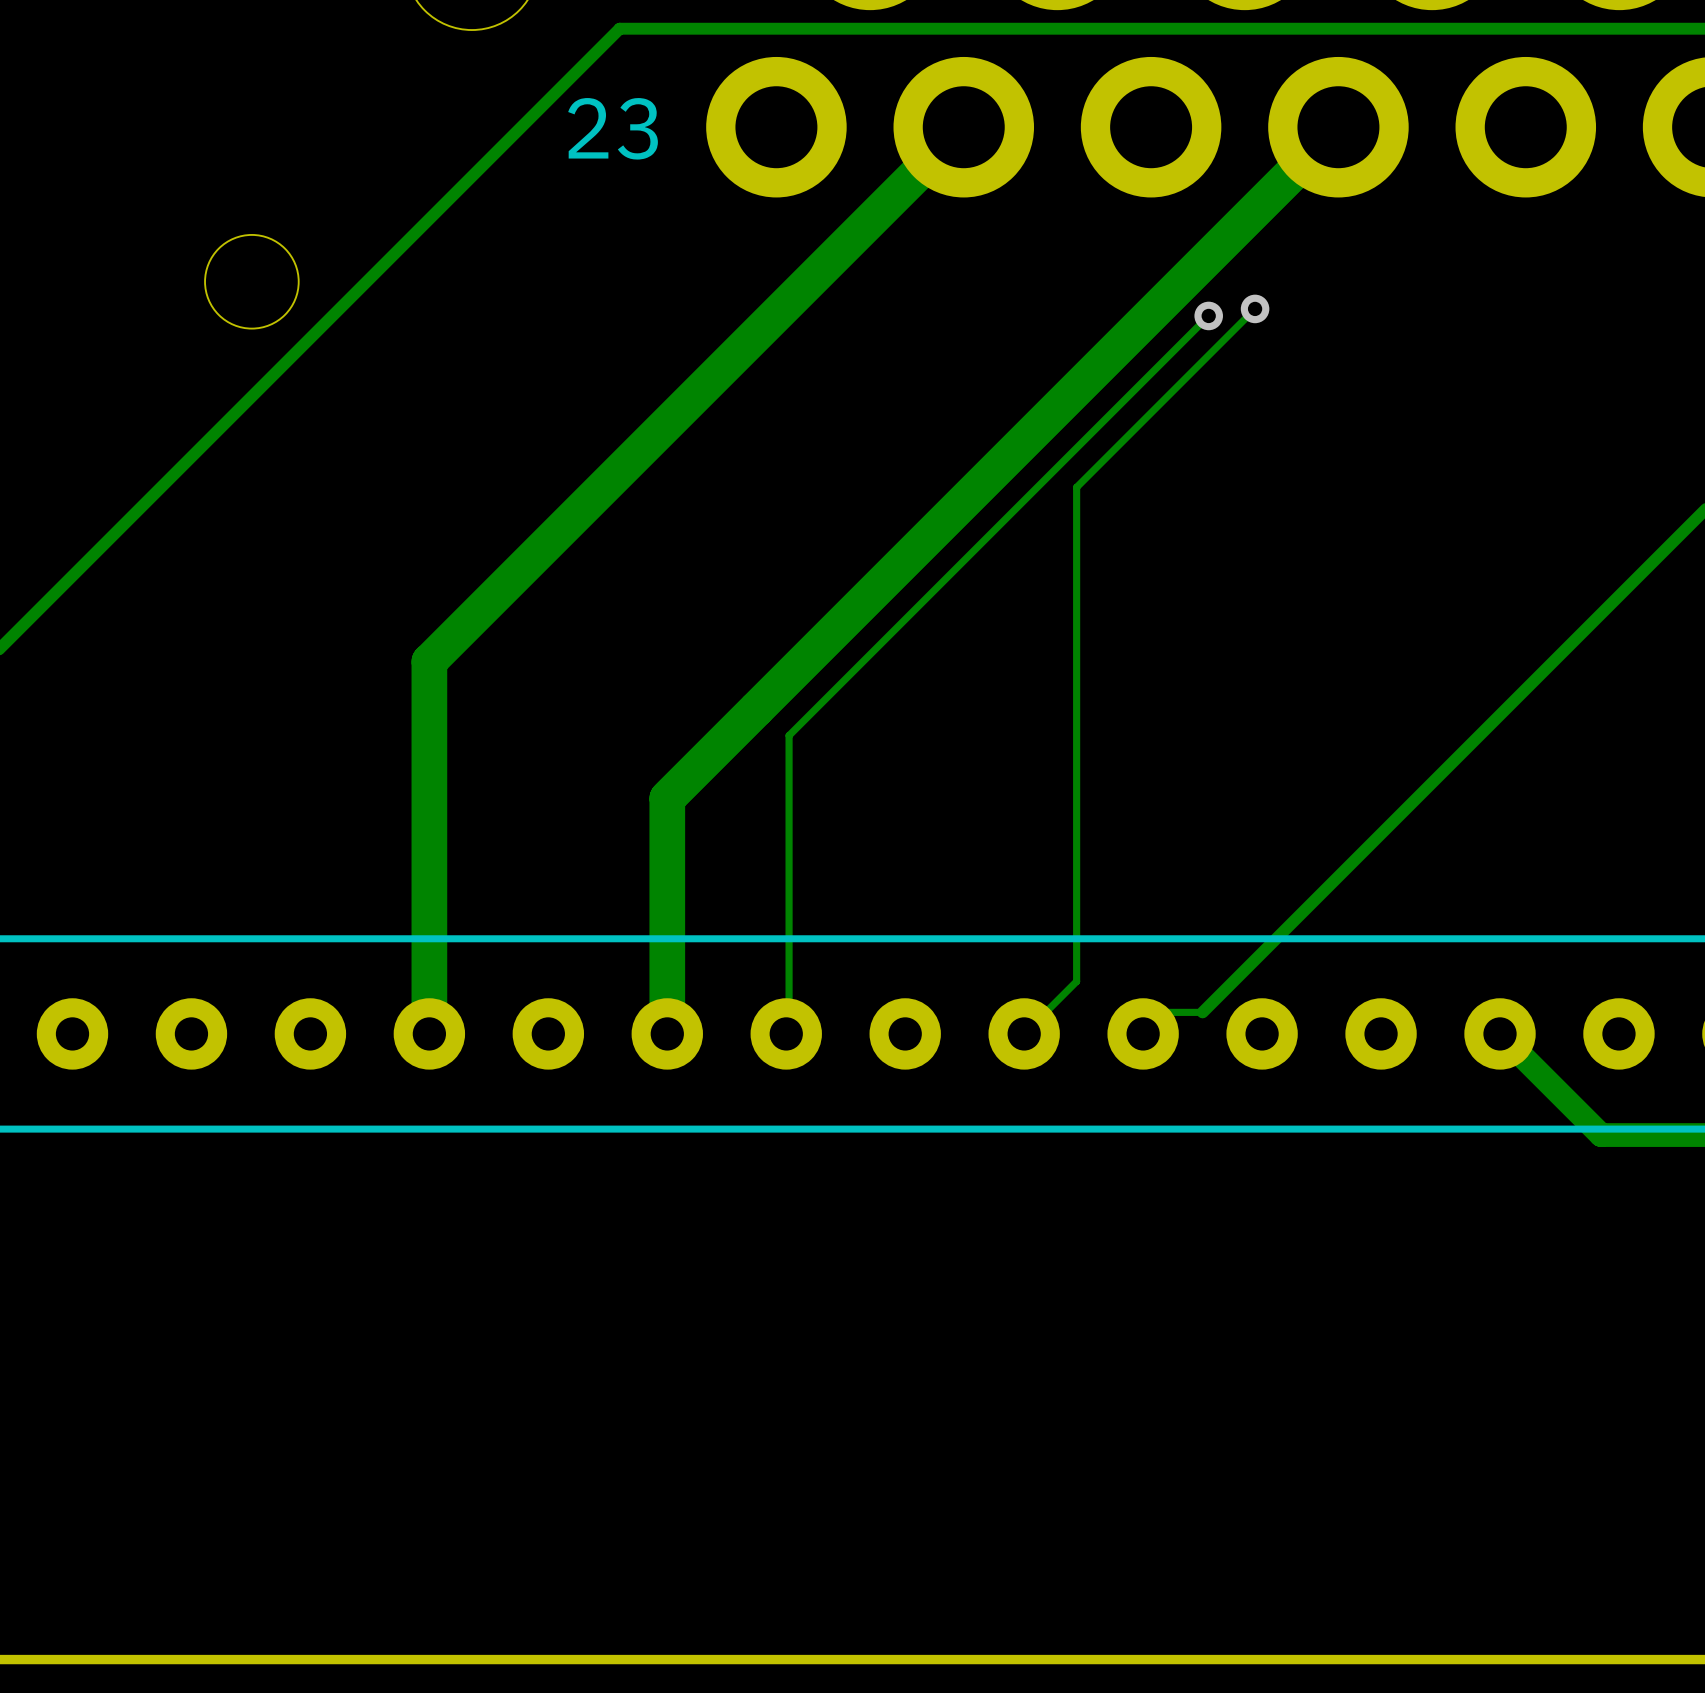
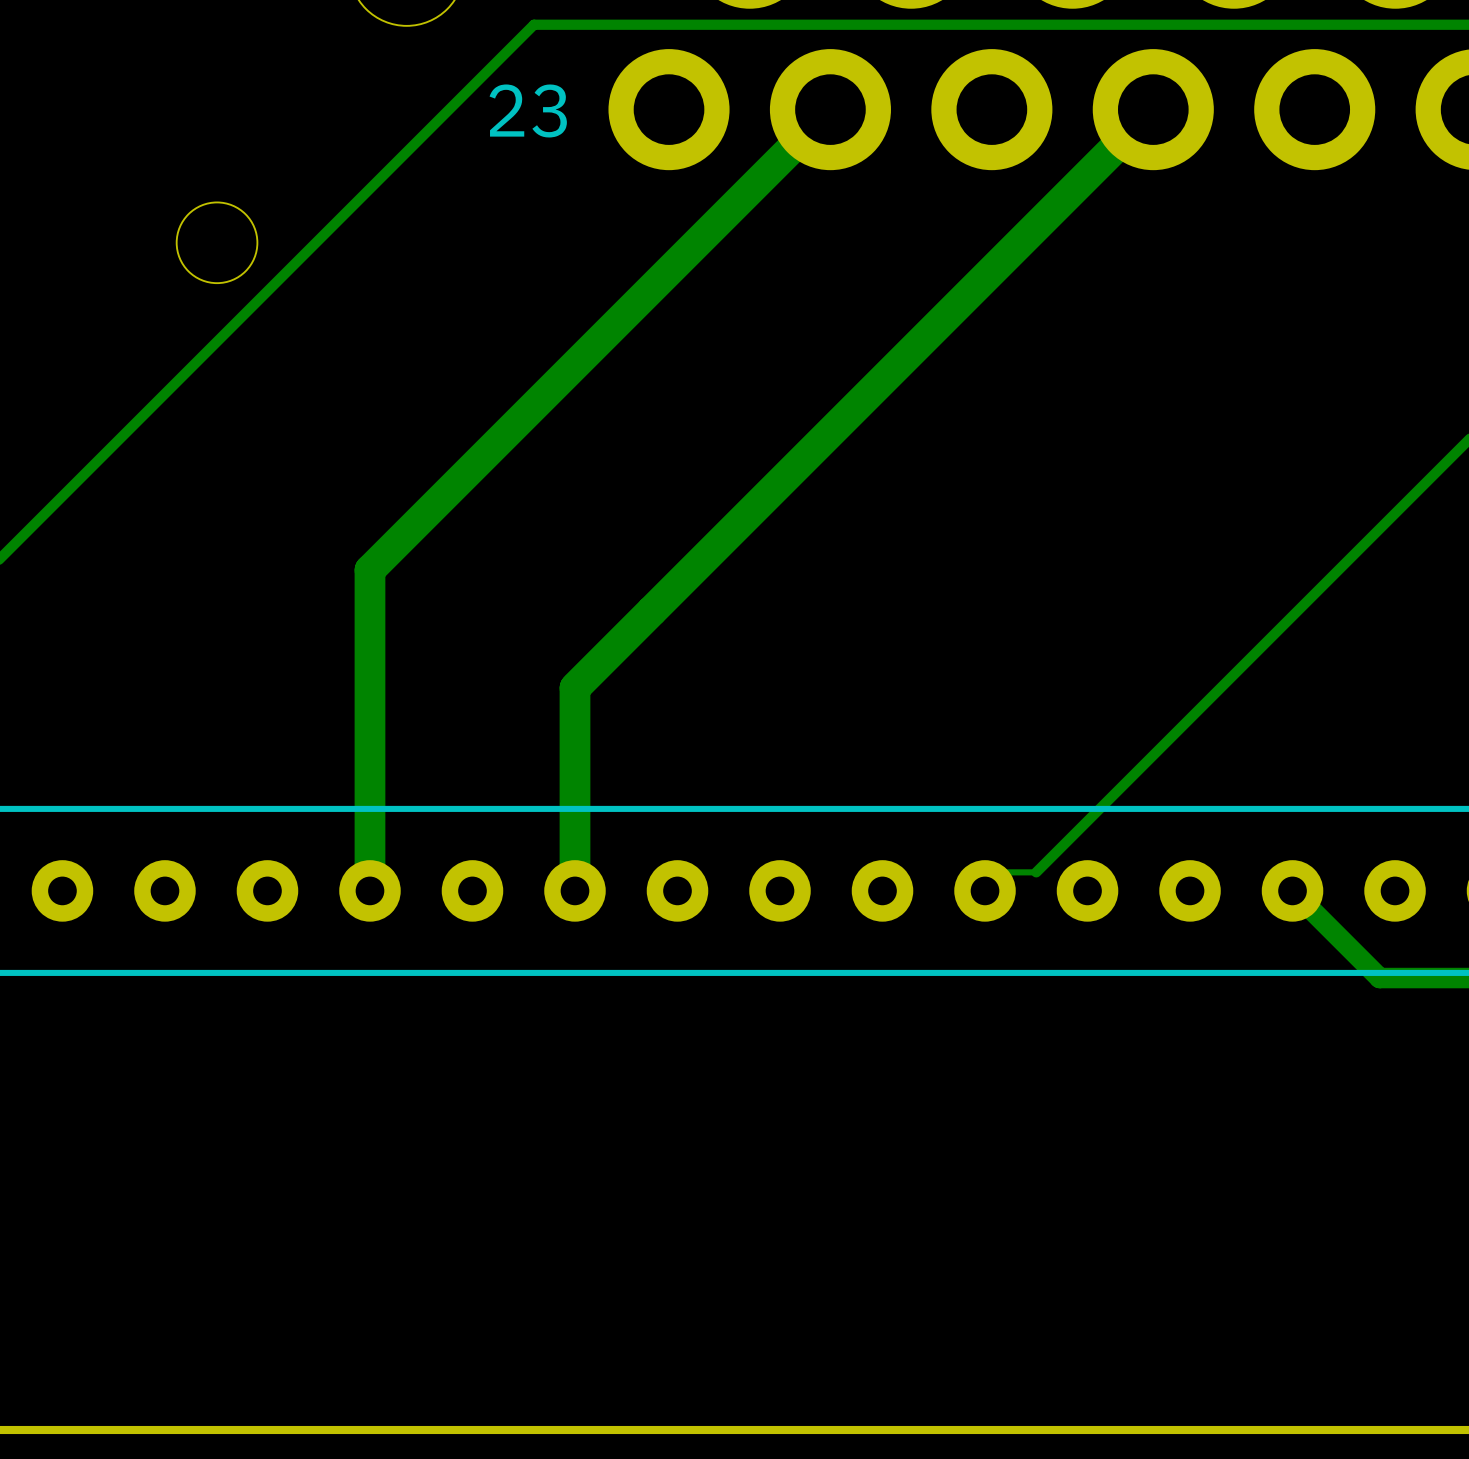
track: (1255, 308) (1076, 487) (1076, 981) (1030, 1027) (1030, 1034) -> none
via: (1255, 308) -> none
track: (1208, 315) (789, 735) (789, 1033) -> none
via: (1208, 315) -> none

